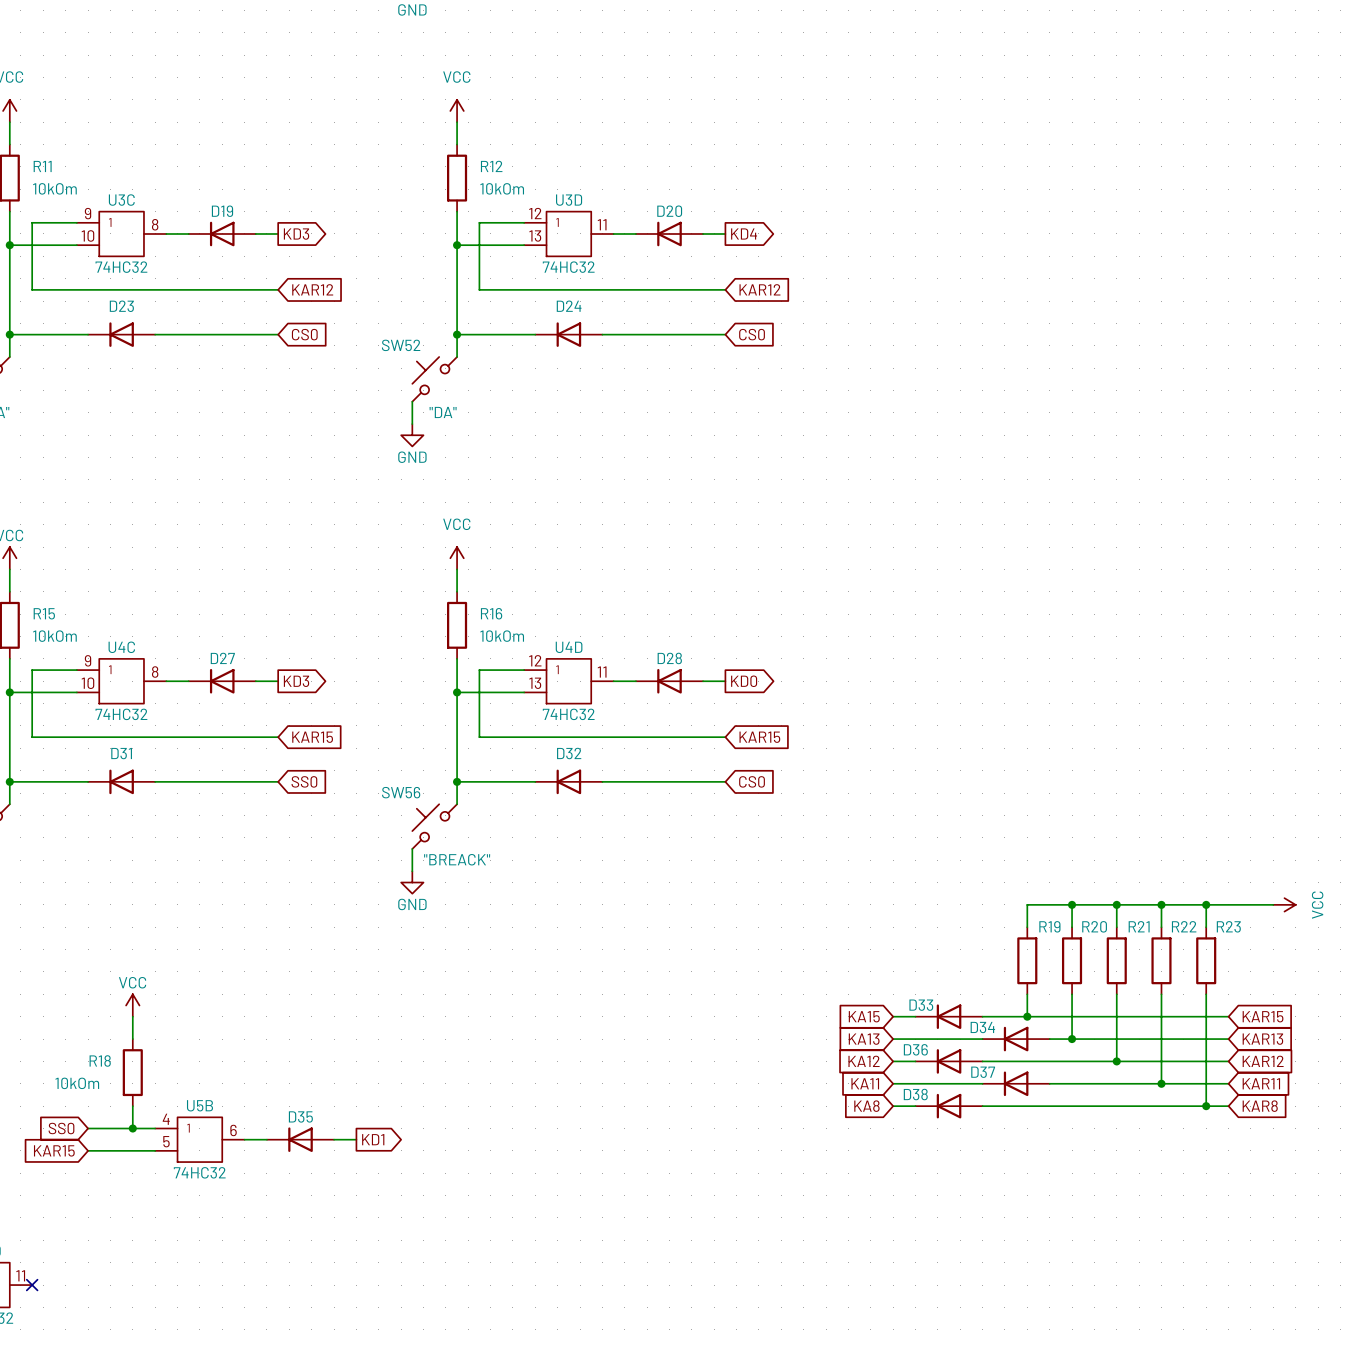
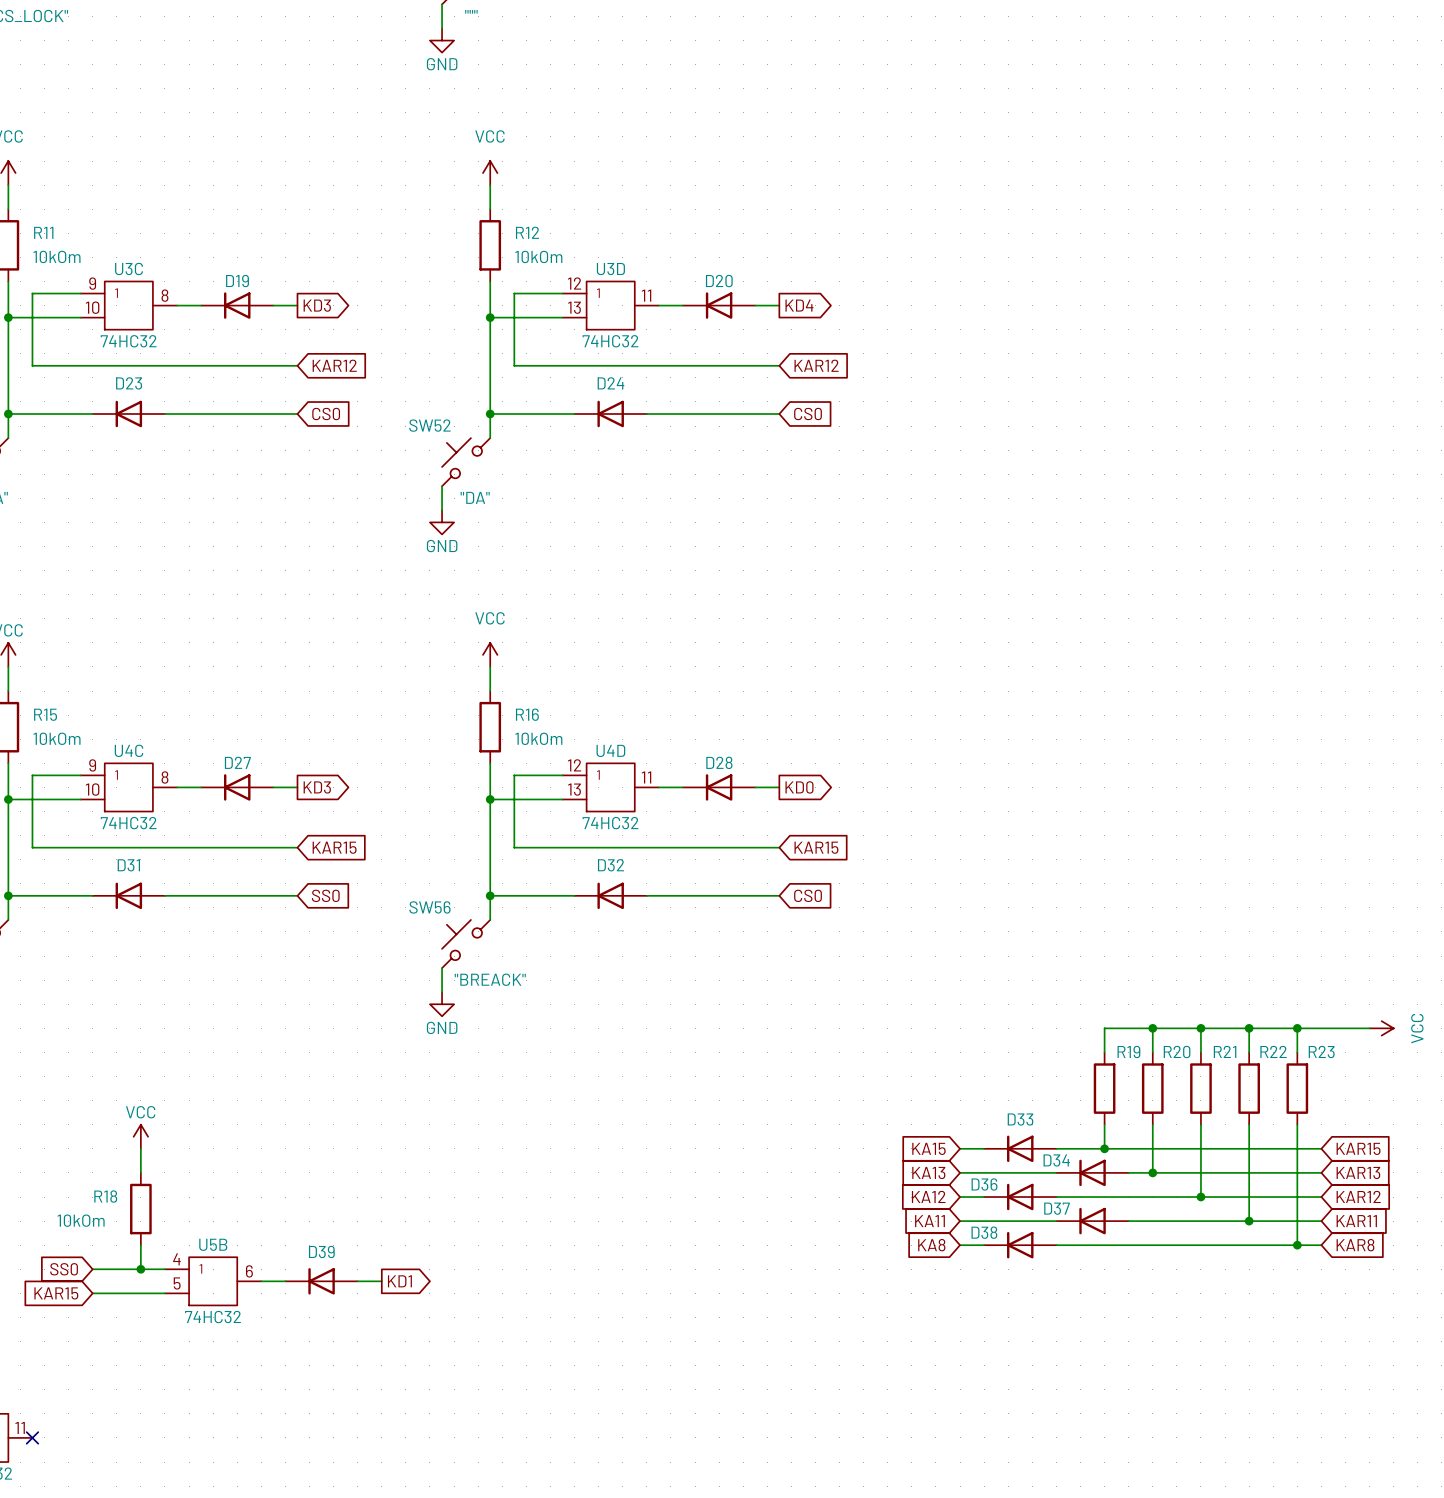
D33 name position: D33 (921, 1005) -> D33 (1020, 1119)
D35 name: D35 (300, 1116) -> D39 (321, 1251)

